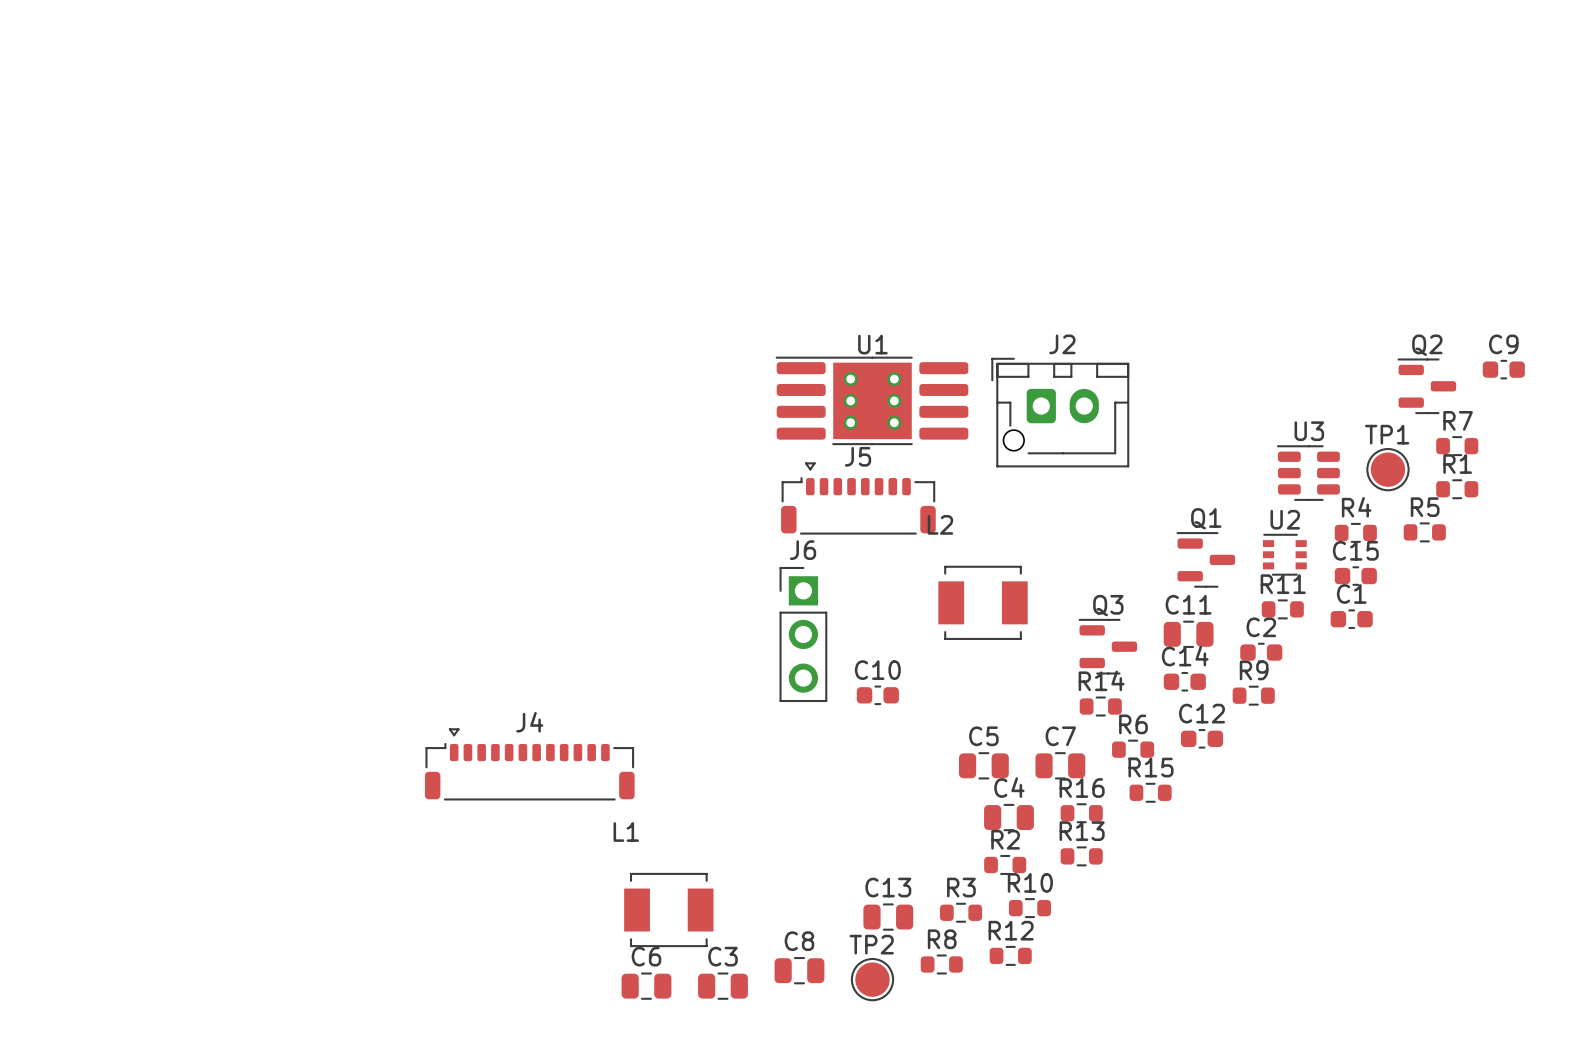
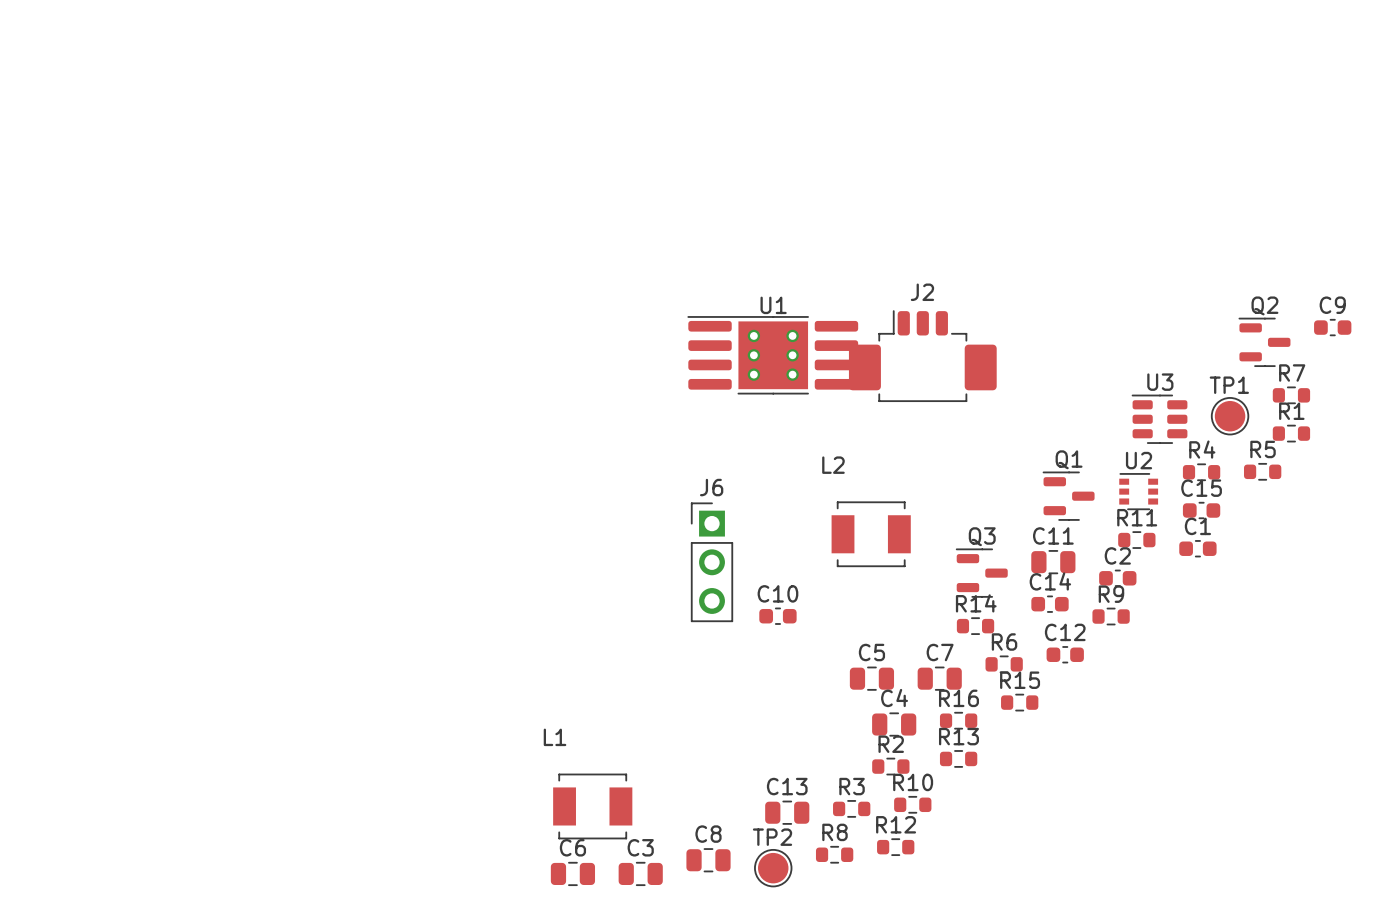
J2 footprint: [991, 357, 1130, 468] -> [848, 310, 997, 403]
J5: (858, 498) -> none
J4: (529, 764) -> none

